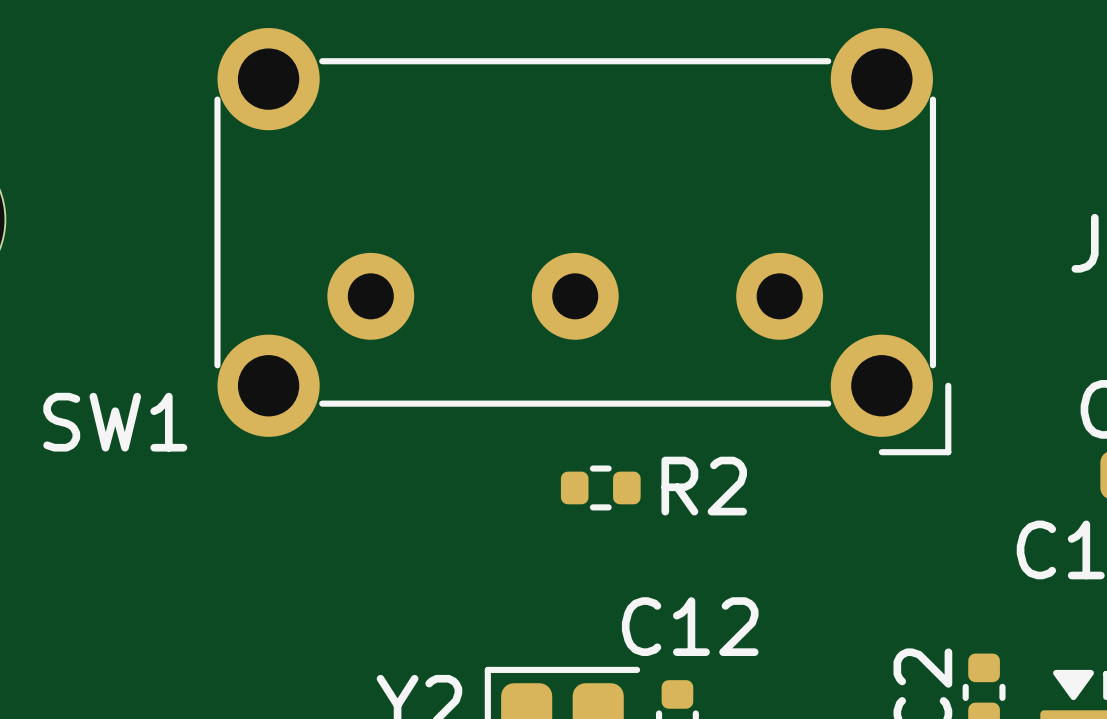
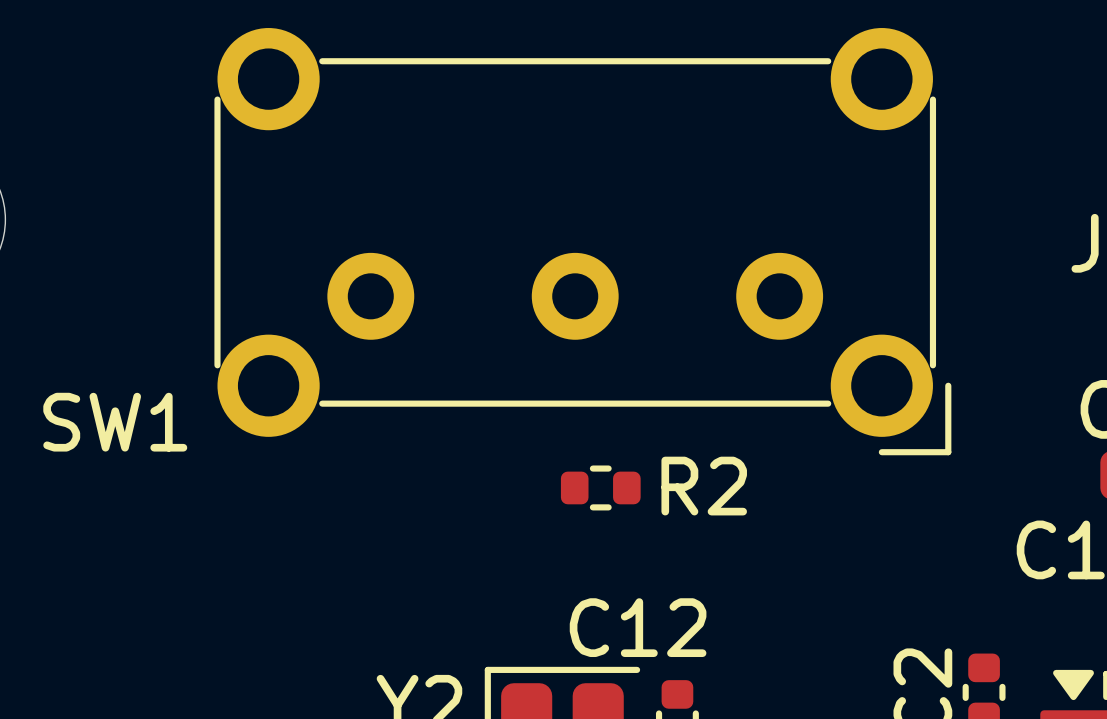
C12 name position: C12 (690, 626) -> C12 (638, 627)

